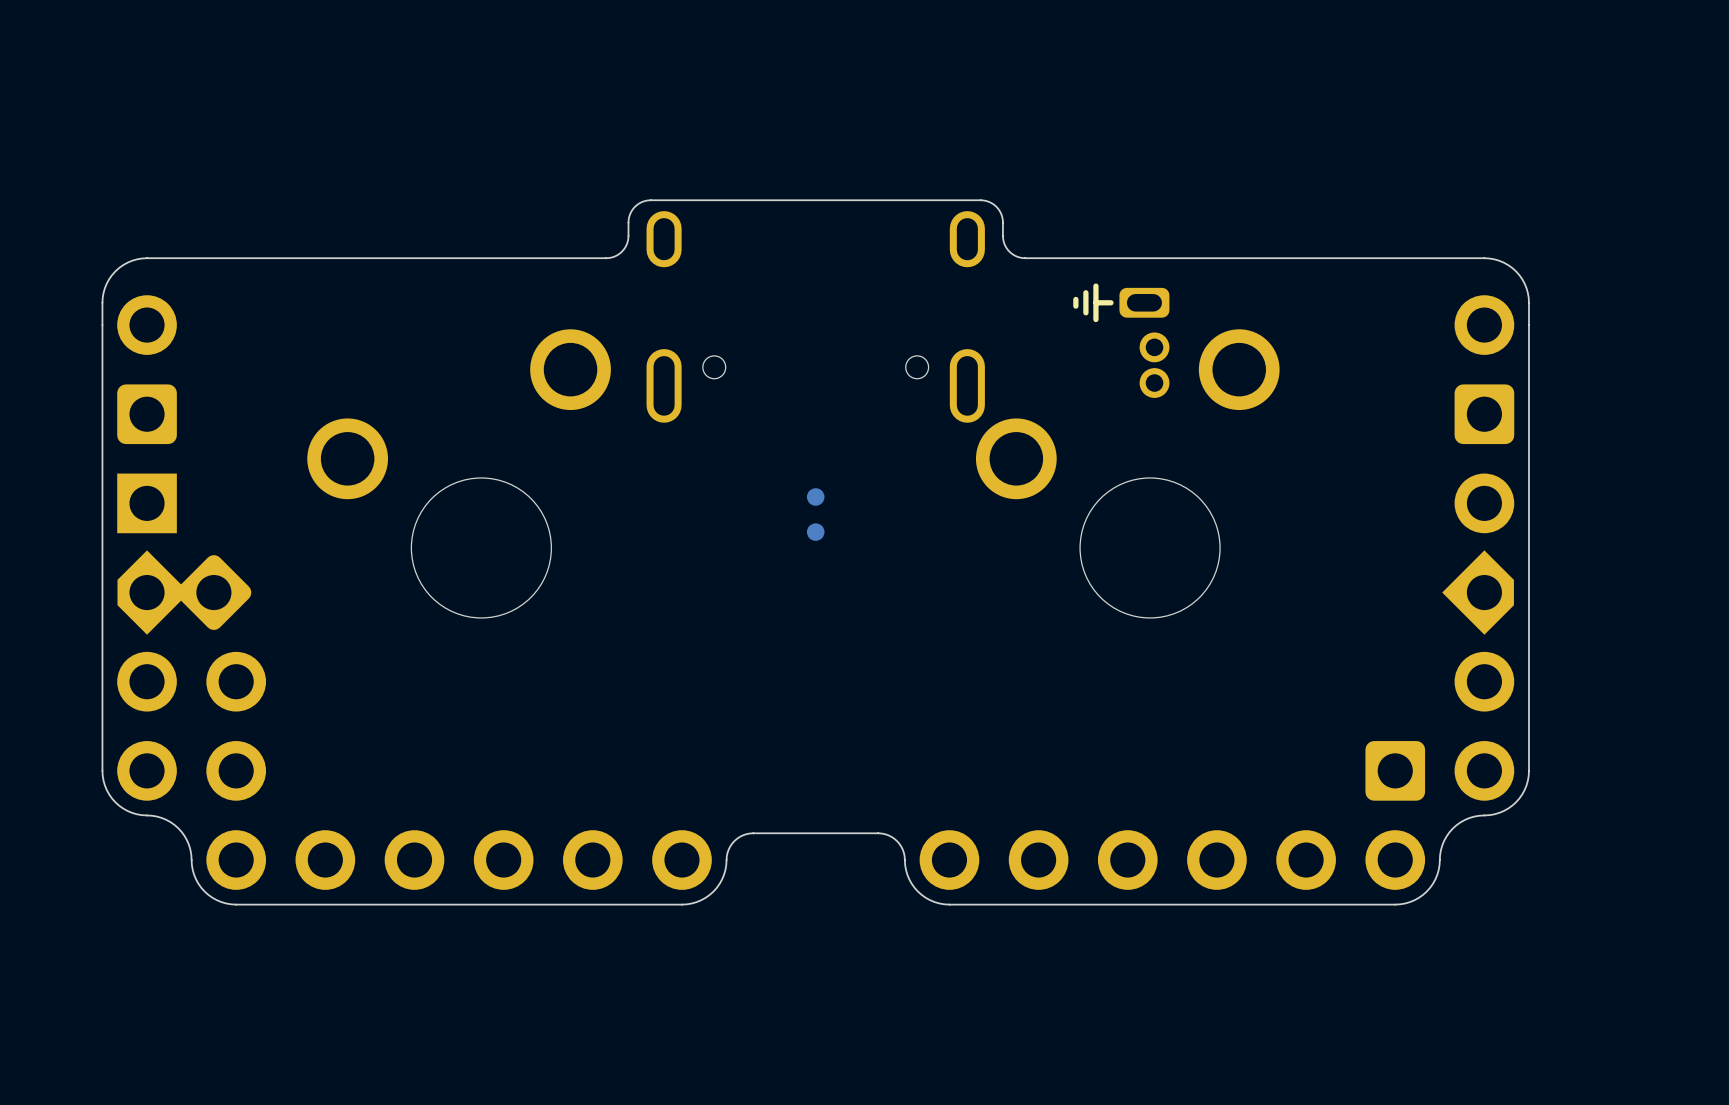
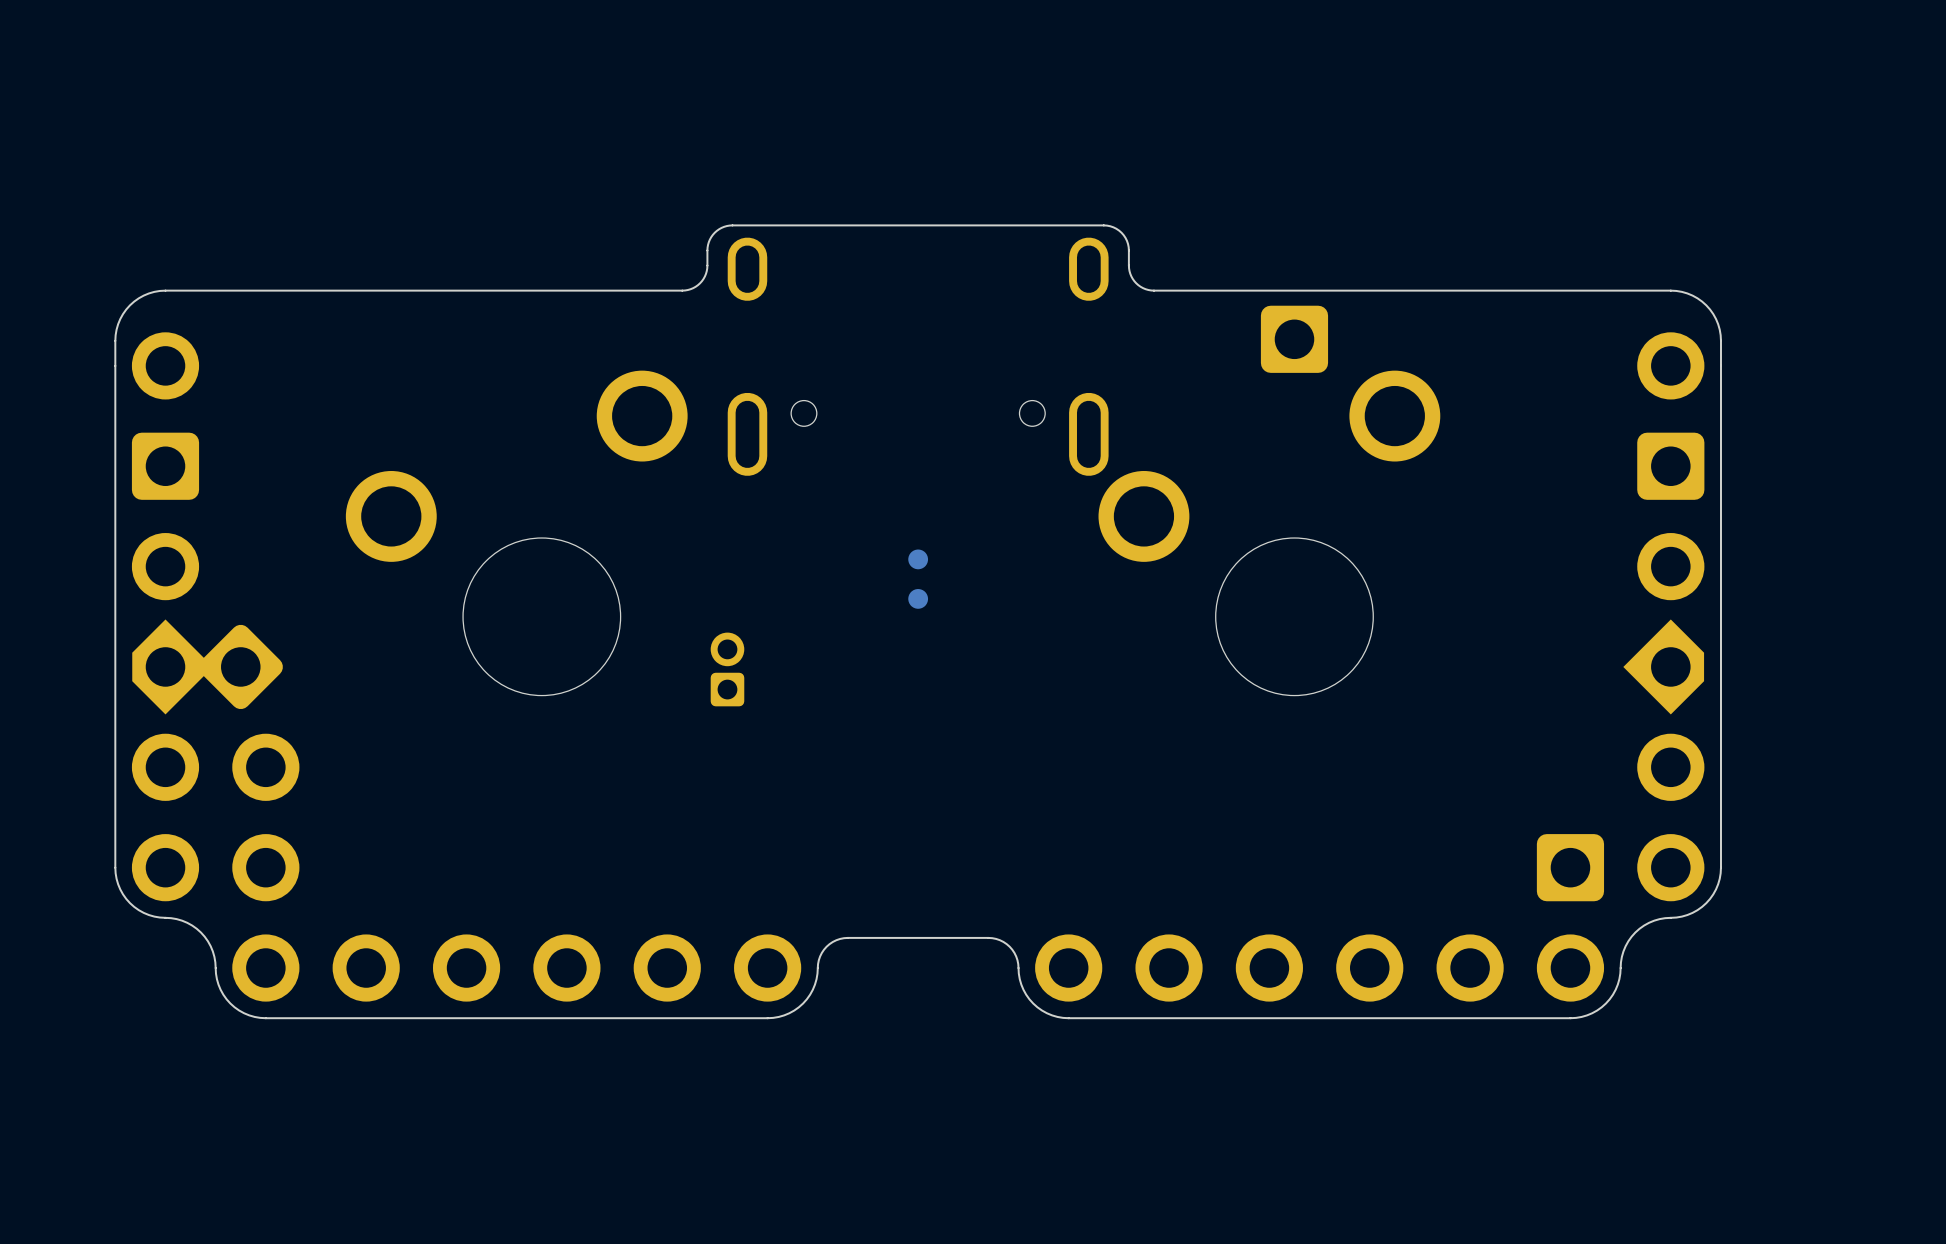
part footprint: [101, 295, 1530, 906] -> [114, 332, 1722, 1020]
part: none -> (1294, 339)
part: (1144, 342) -> none
part: none -> (727, 669)

